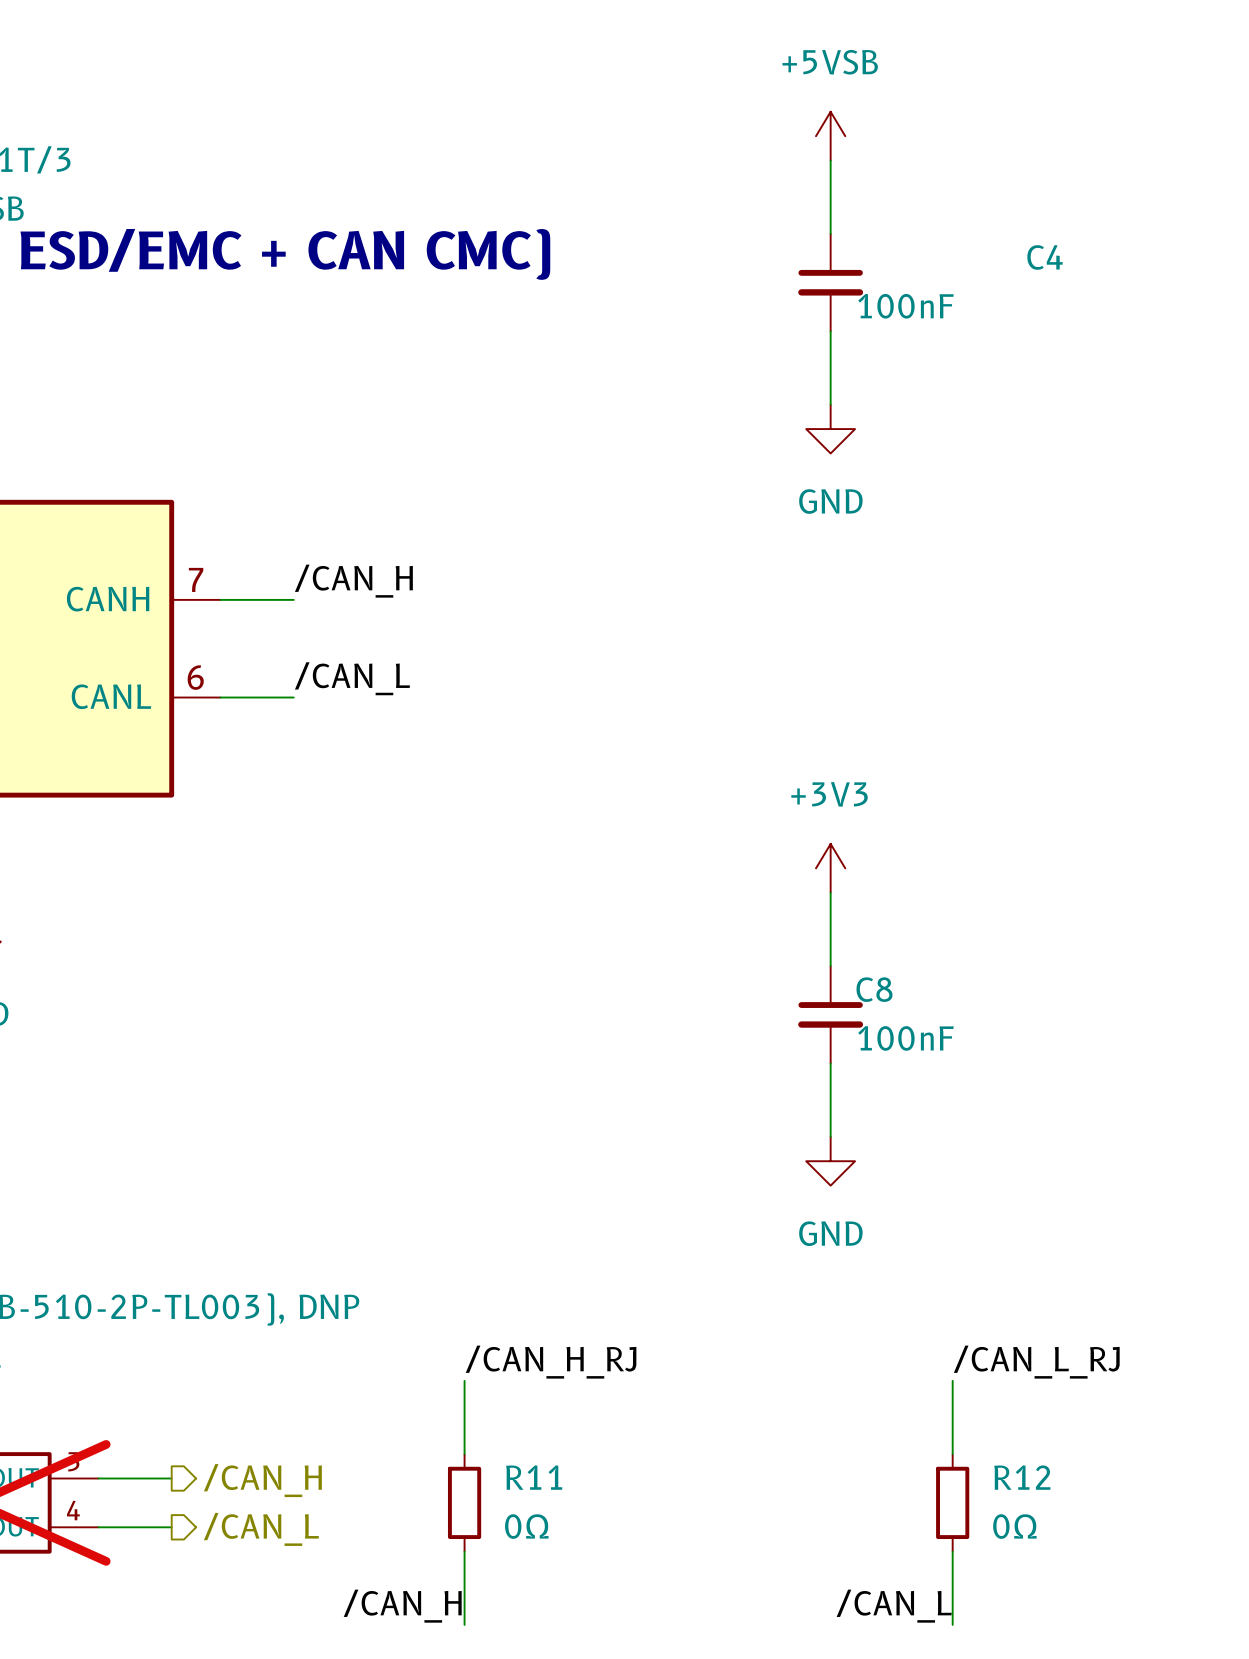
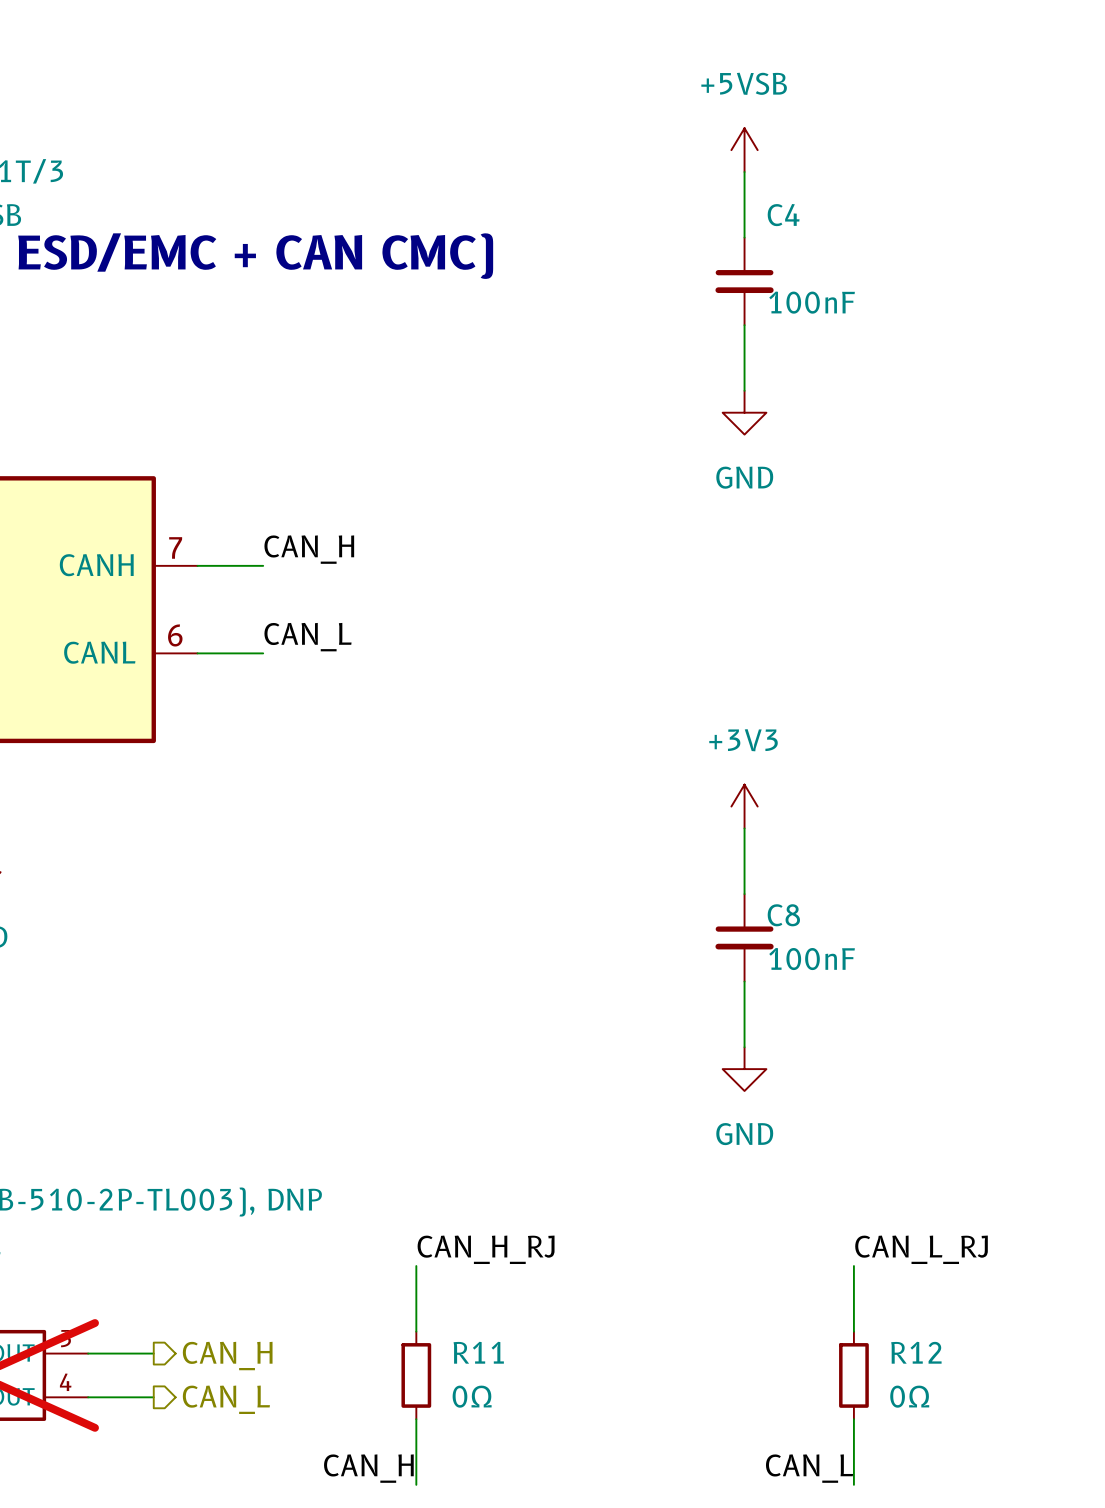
C4 name position: C4 (1045, 257) -> C4 (783, 215)
label: /CAN_H (353, 581) -> CAN_H (309, 549)
label: /CAN_L (352, 678) -> CAN_L (308, 637)
label: /CAN_H_RJ (551, 1362) -> CAN_H_RJ (486, 1249)
label: /CAN_L_RJ (1036, 1362) -> CAN_L_RJ (921, 1249)
hierarchical label: /CAN_H (262, 1480) -> CAN_H (227, 1356)
hierarchical label: /CAN_L (261, 1529) -> CAN_L (226, 1399)
label: /CAN_H (402, 1606) -> CAN_H (368, 1468)
label: /CAN_L (894, 1606) -> CAN_L (809, 1468)

